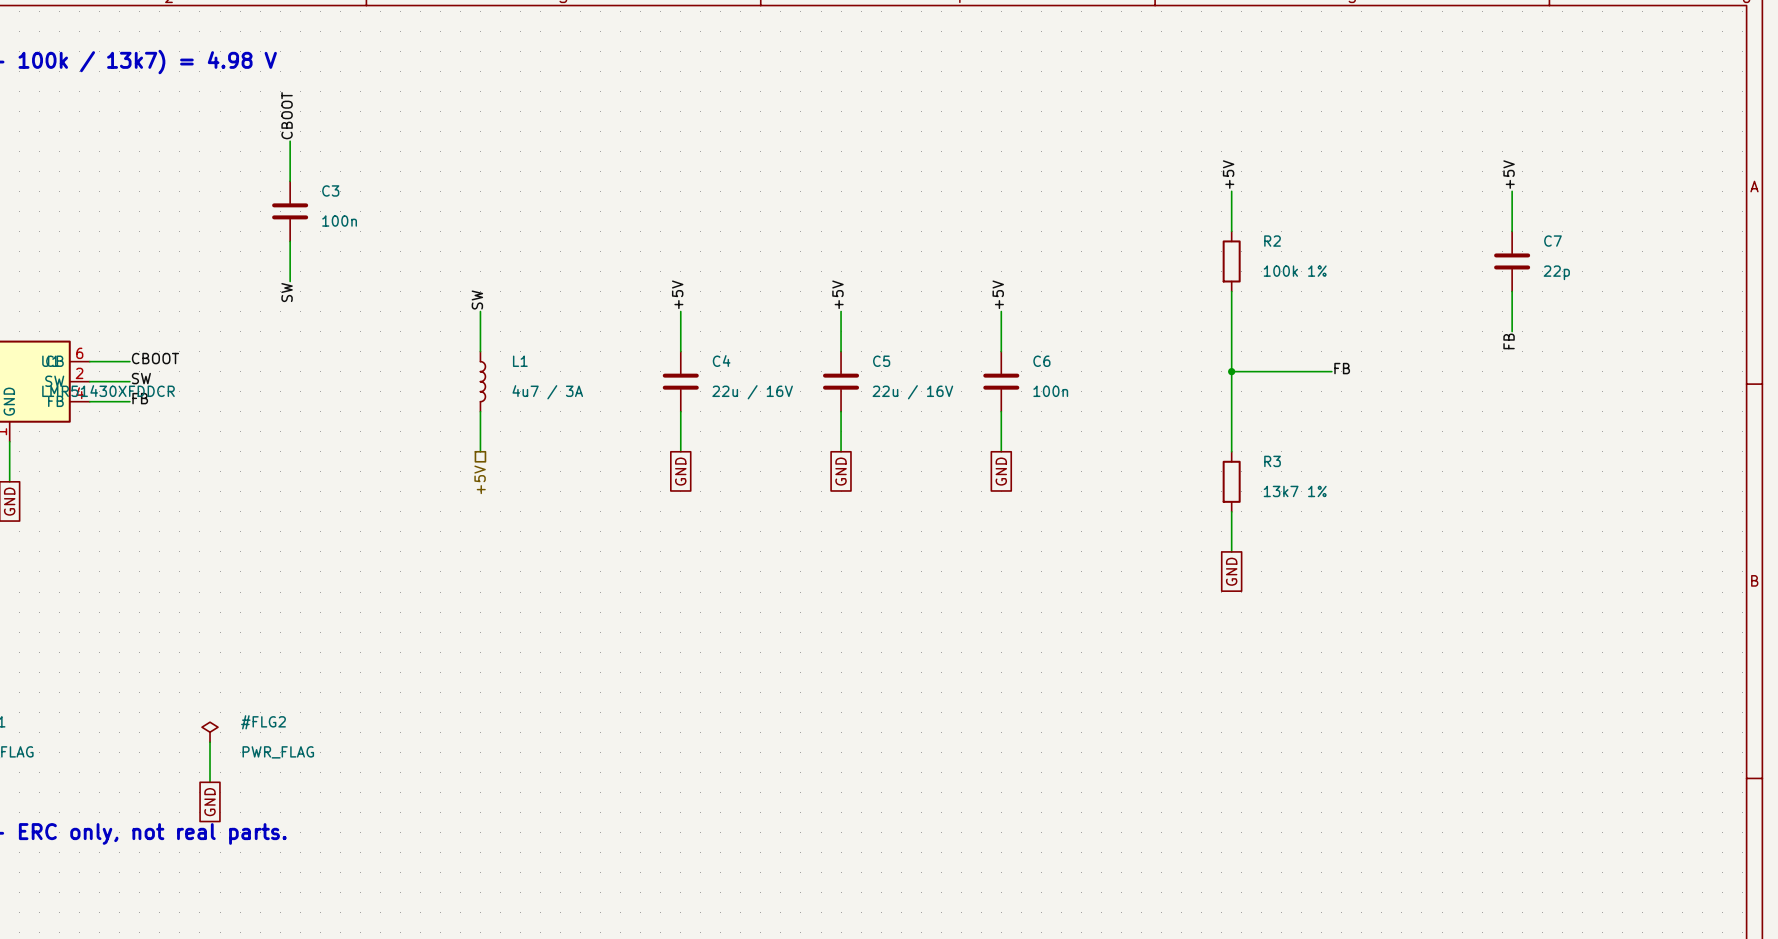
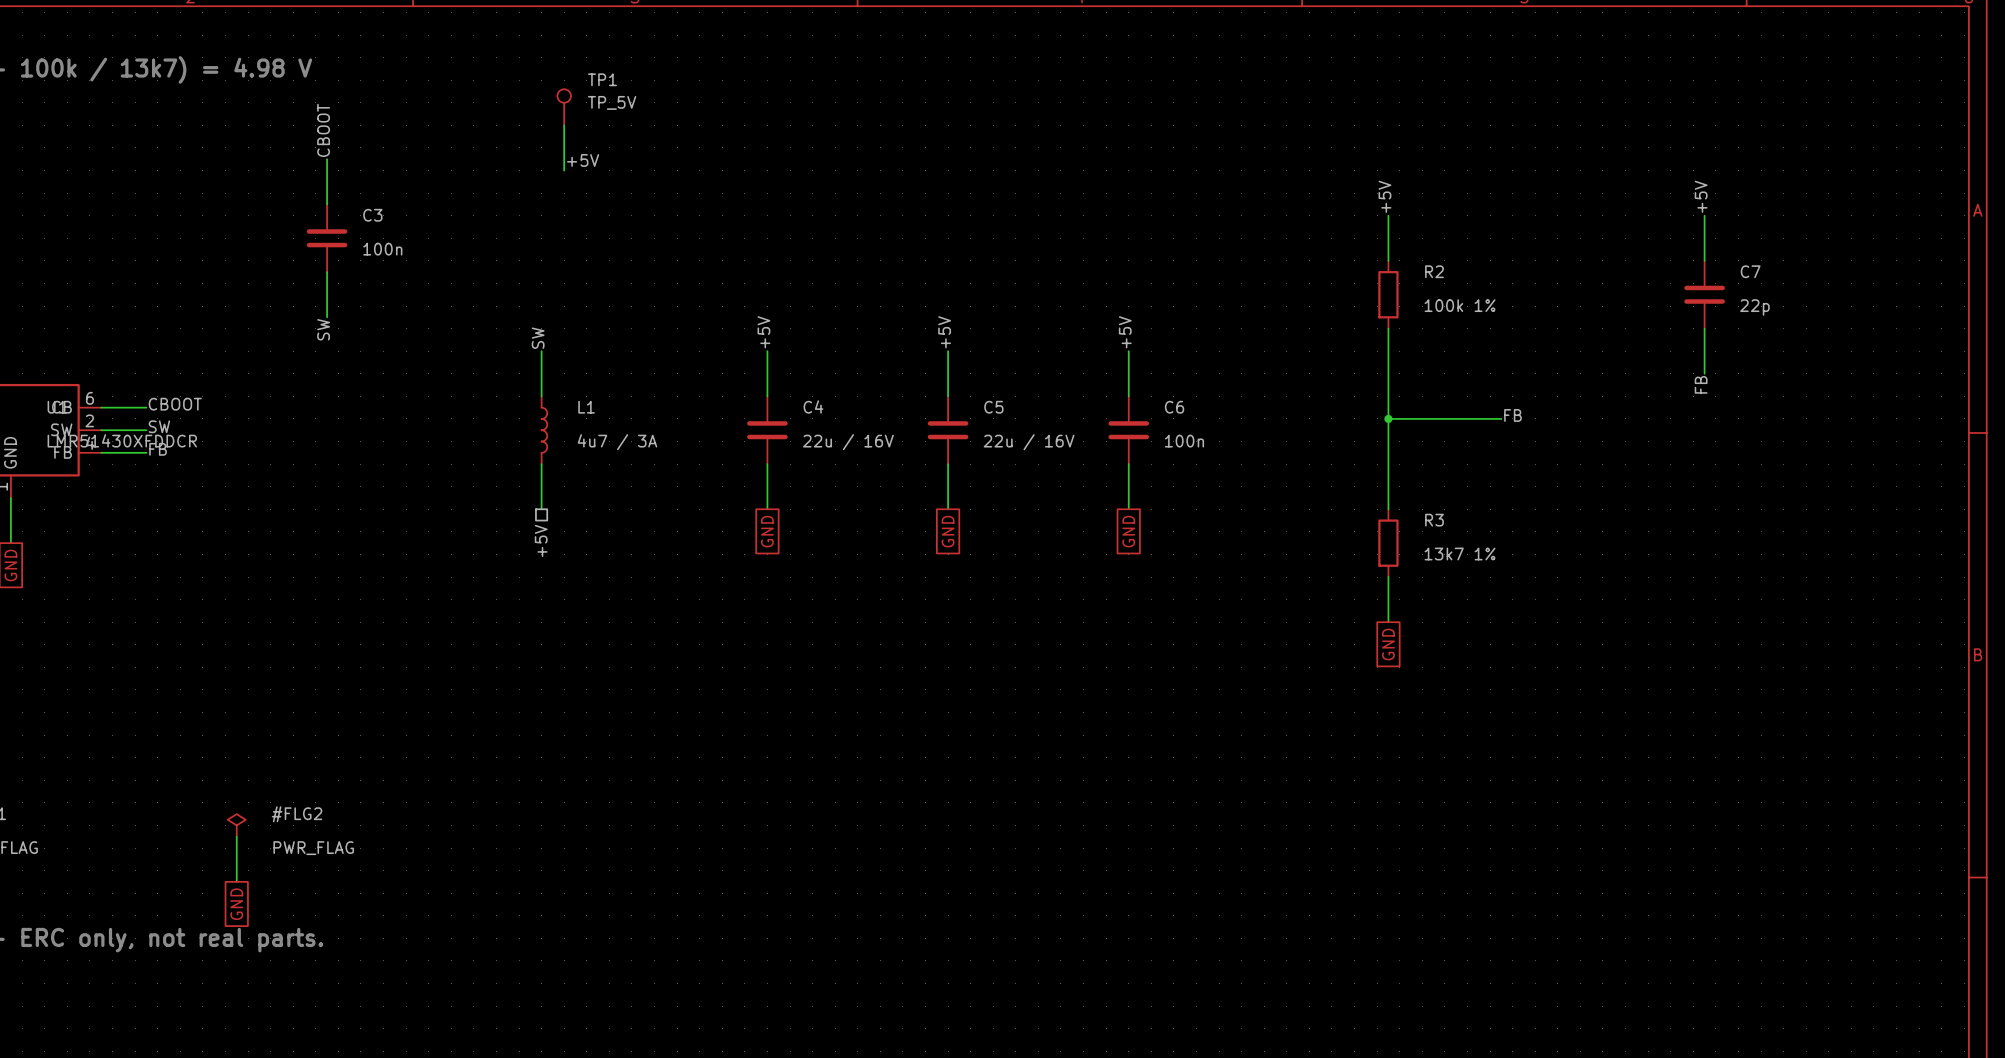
TP1: none -> TP_5V (564, 107)
wire: none -> (564, 125) (564, 170)
label: none -> +5V (583, 160)

